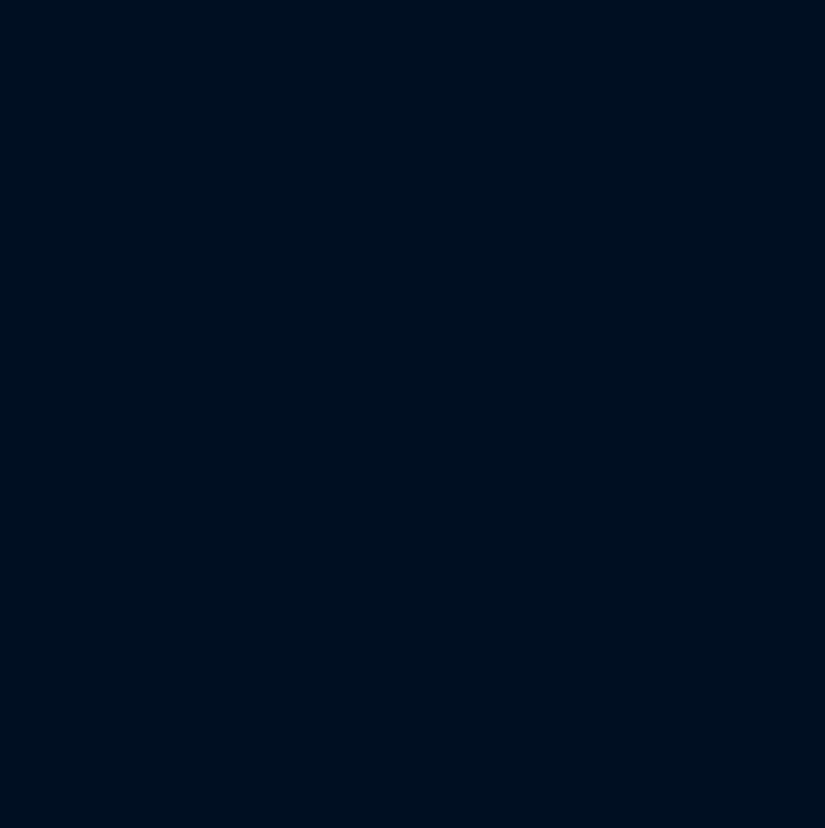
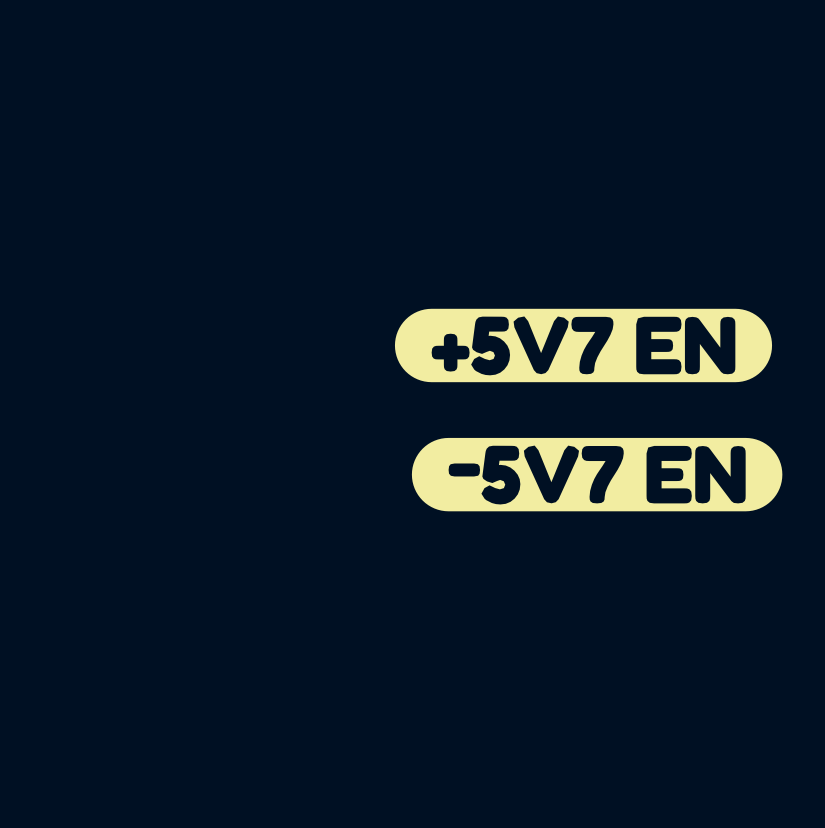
drawing: none -> [394, 308, 783, 512]

